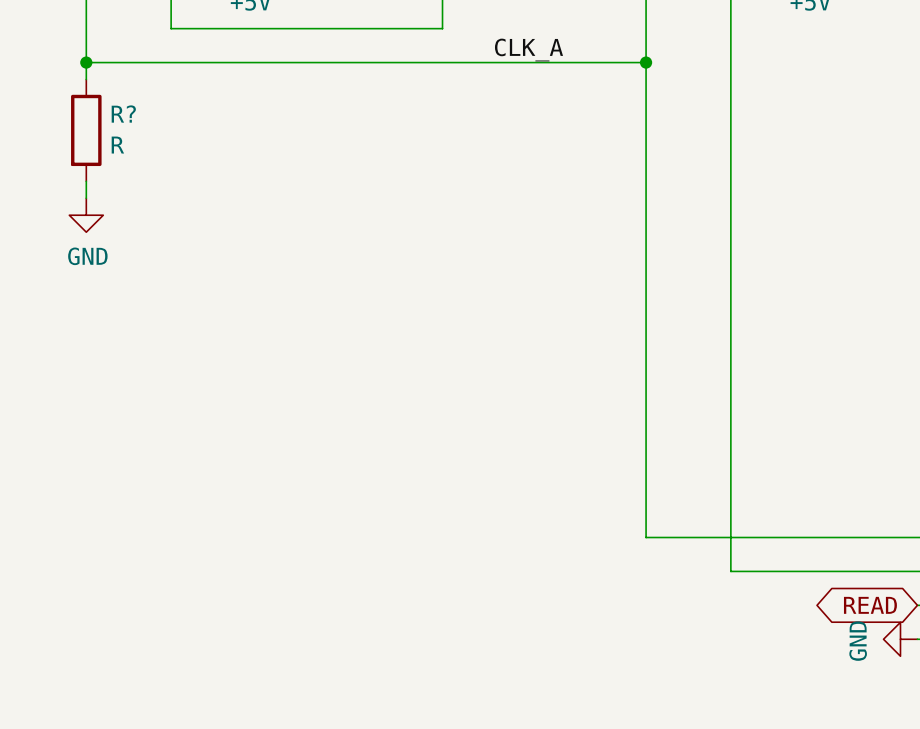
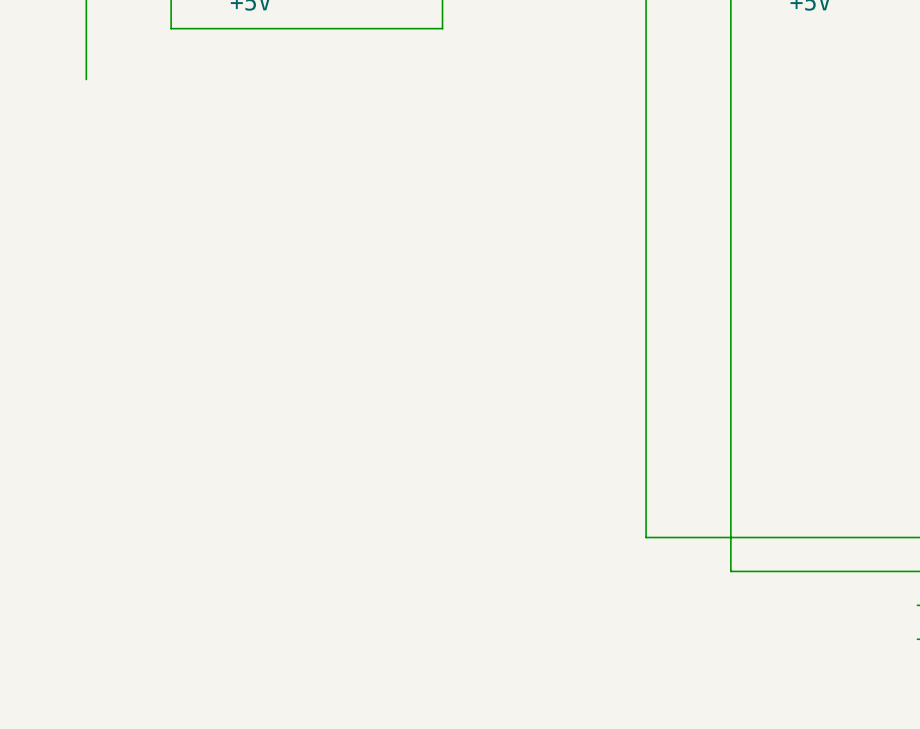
label: CLK_A (528, 50) -> none
wire: (86, 62) (646, 62) -> none
junction: (86, 62) -> none
junction: (646, 62) -> none
R?: R (86, 130) -> none
wire: (86, 181) (86, 198) -> none
power symbol: GND (86, 215) -> none
global label: READ (870, 605) -> none
power symbol: GND (900, 639) -> none

